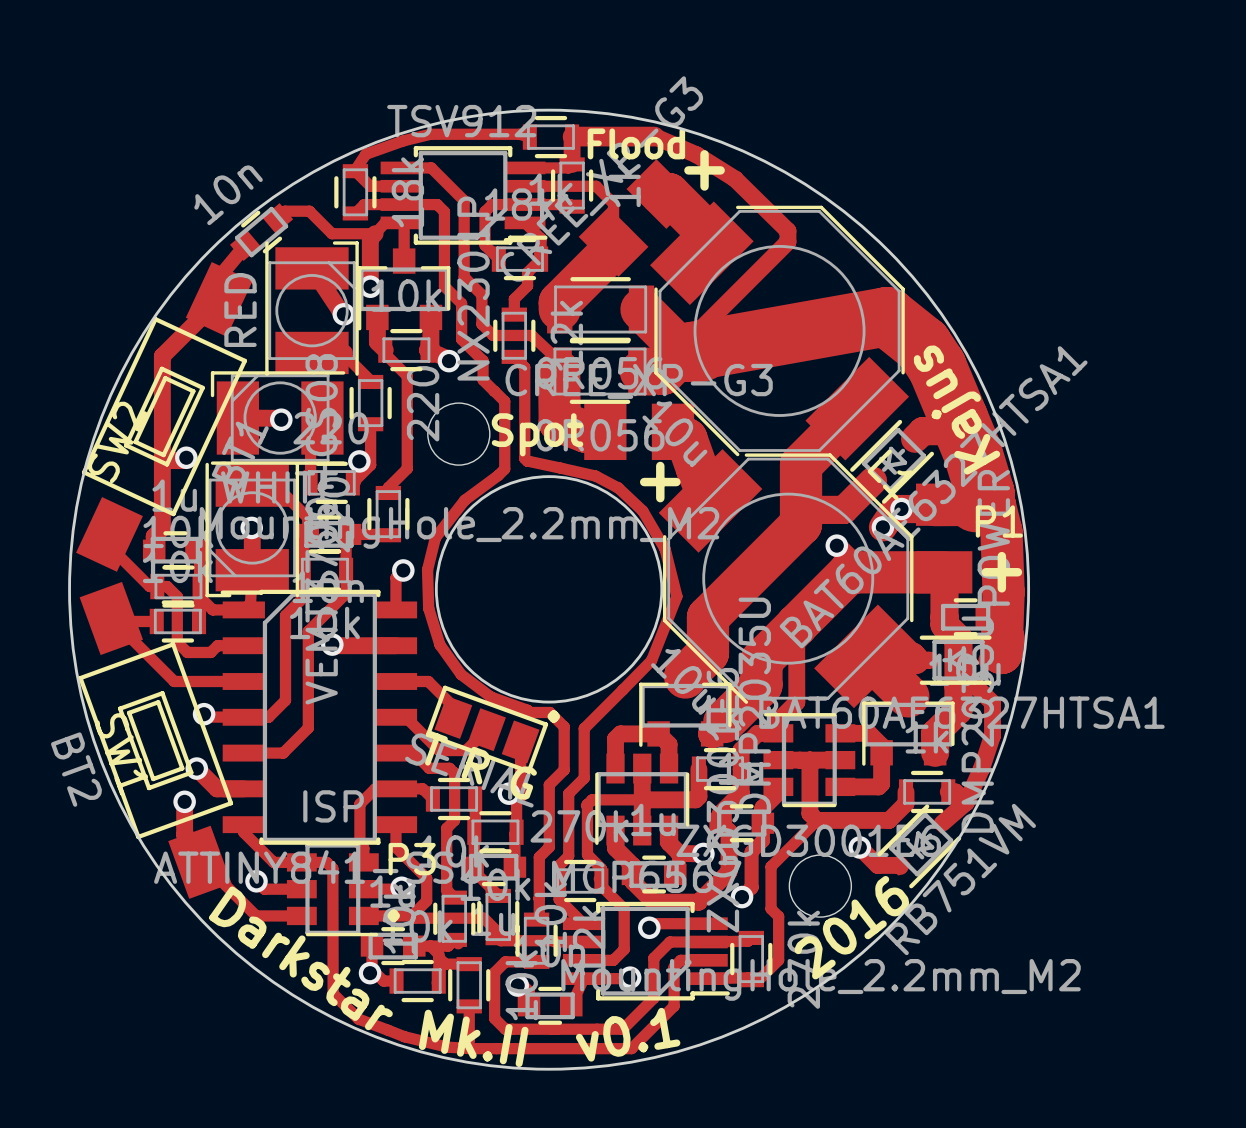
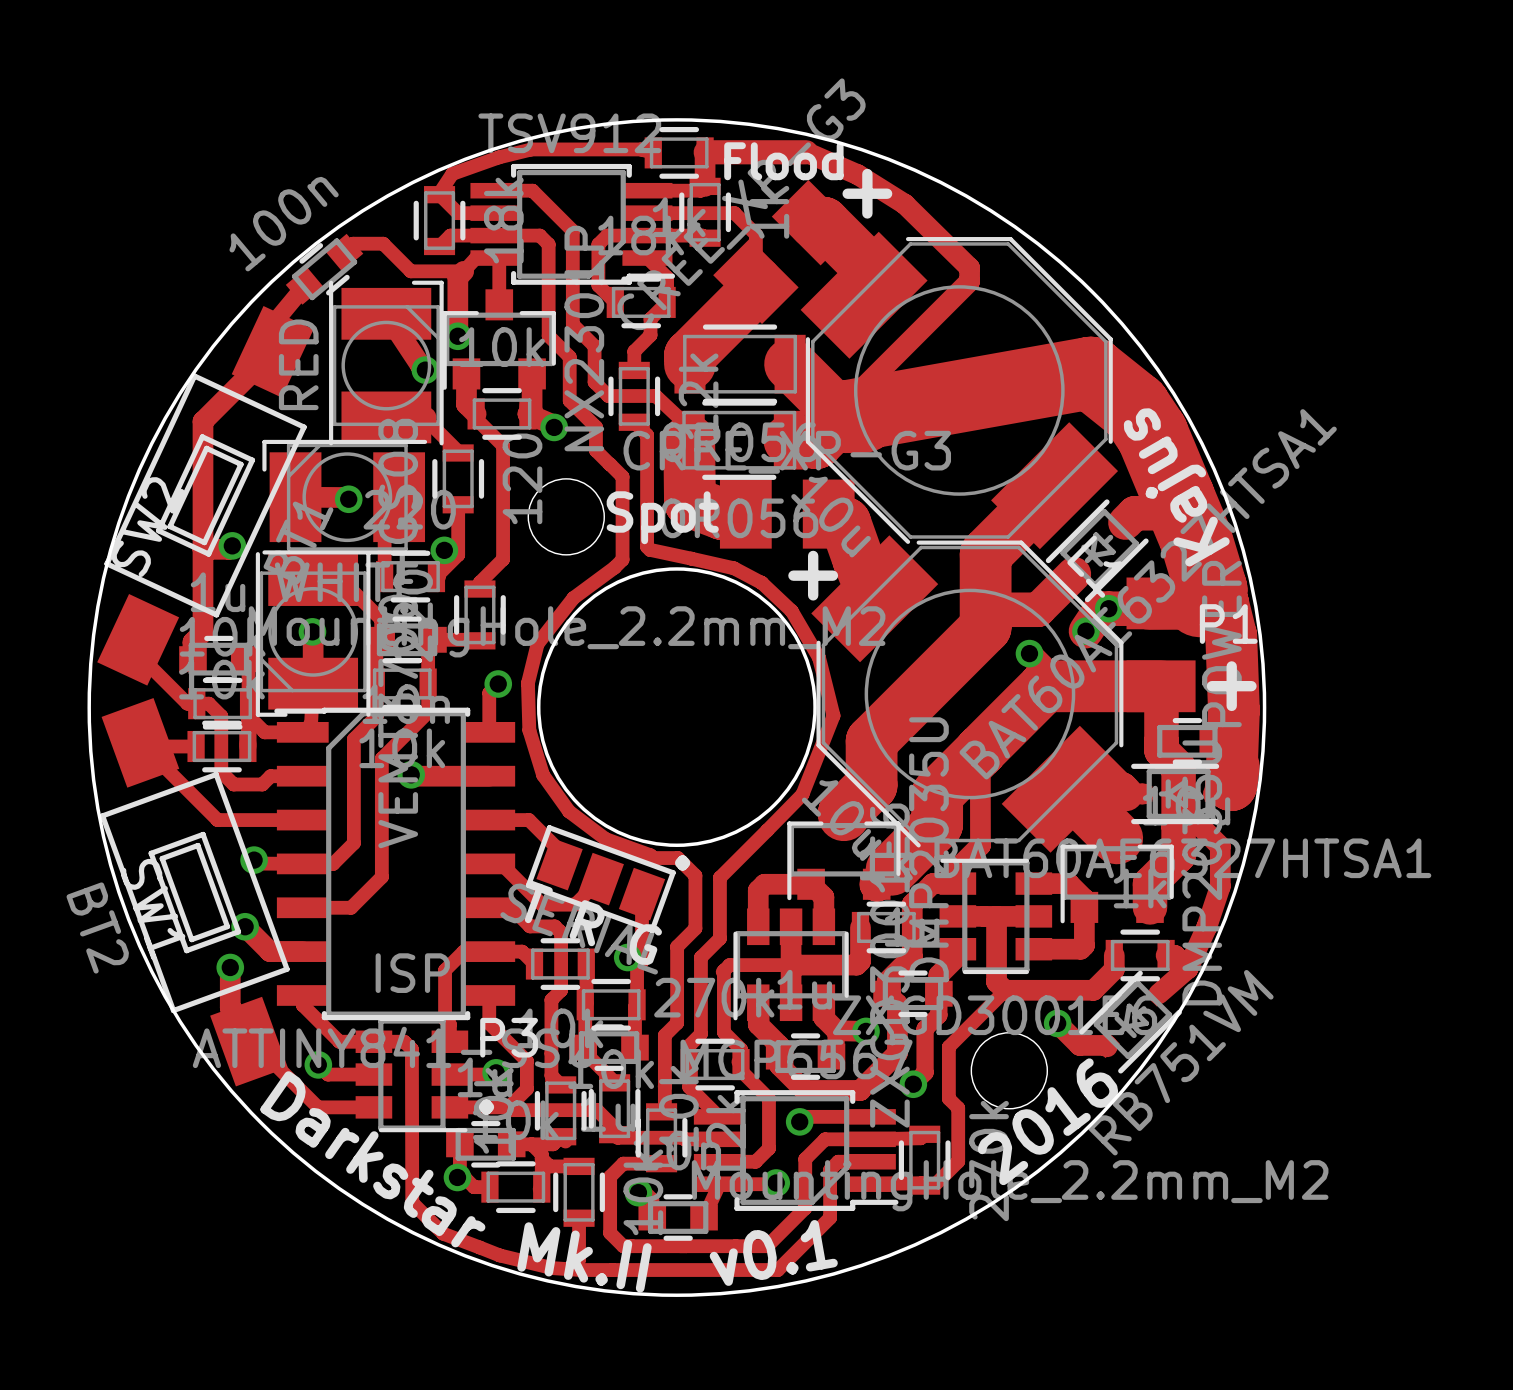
part value: 10n (228, 195) -> 100n (284, 224)
part value: 220 (423, 403) -> 120 (522, 478)

